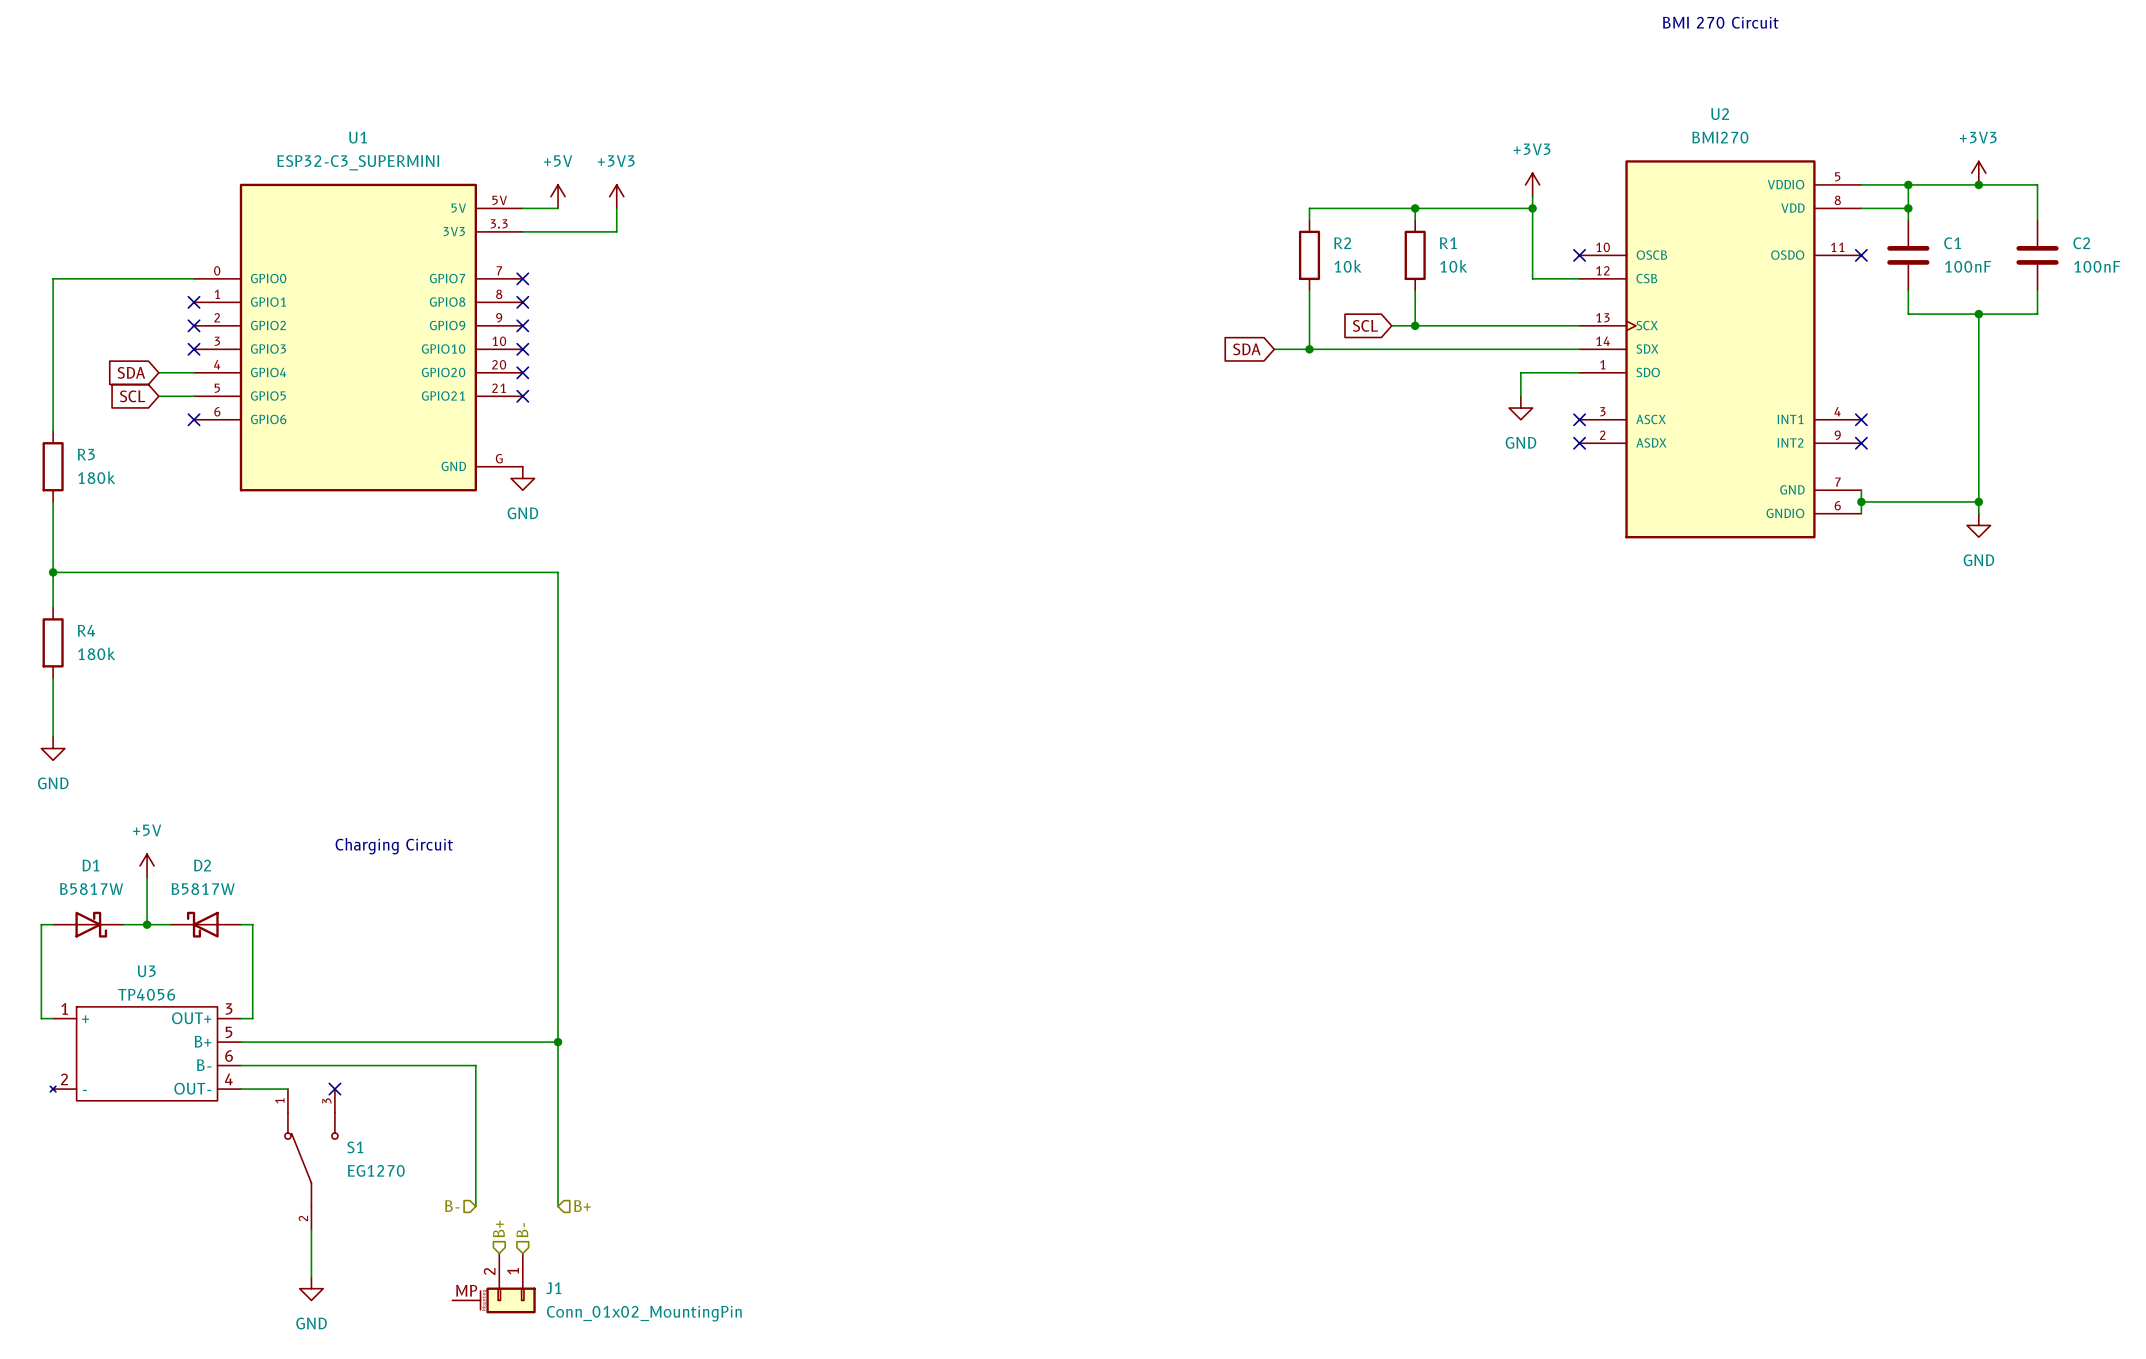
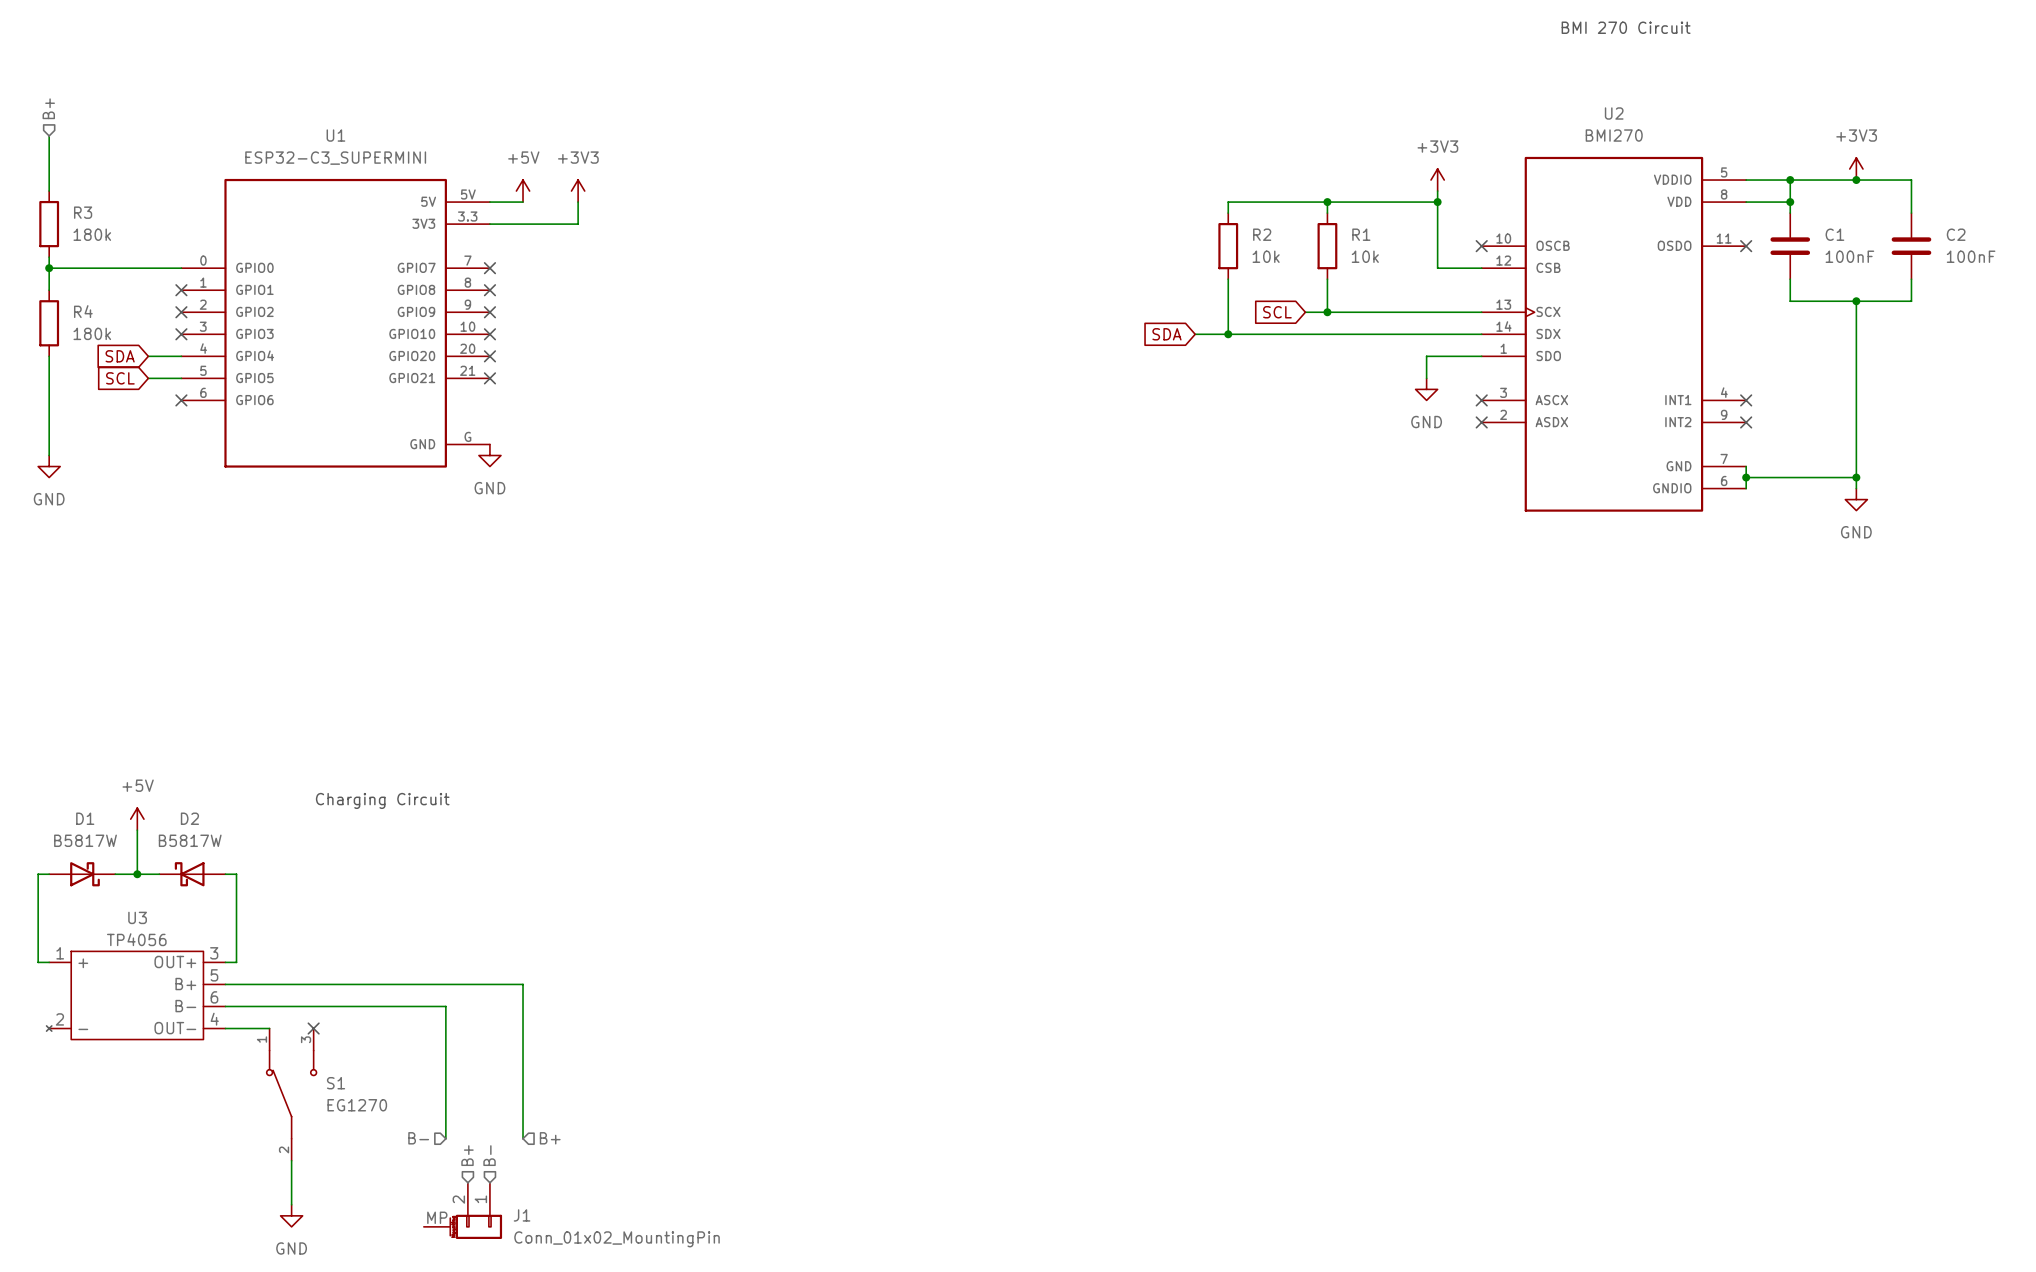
hierarchical label: none -> B+ (48, 108)
wire: none -> (49, 135) (49, 191)
wire: none -> (49, 257) (49, 268)
junction: none -> (49, 268)
wire: (53, 302) (53, 372) -> none
wire: none -> (49, 411) (49, 455)
R3 position: (53, 466) -> (49, 224)
power symbol: none -> GND (49, 466)
wire: (53, 501) (53, 607) -> none
wire: (53, 572) (558, 572) (558, 1042) -> none
junction: (53, 572) -> none
R4 position: (53, 642) -> (49, 323)
wire: (53, 678) (53, 736) -> none
power symbol: GND (53, 748) -> none
junction: (558, 1042) -> none

